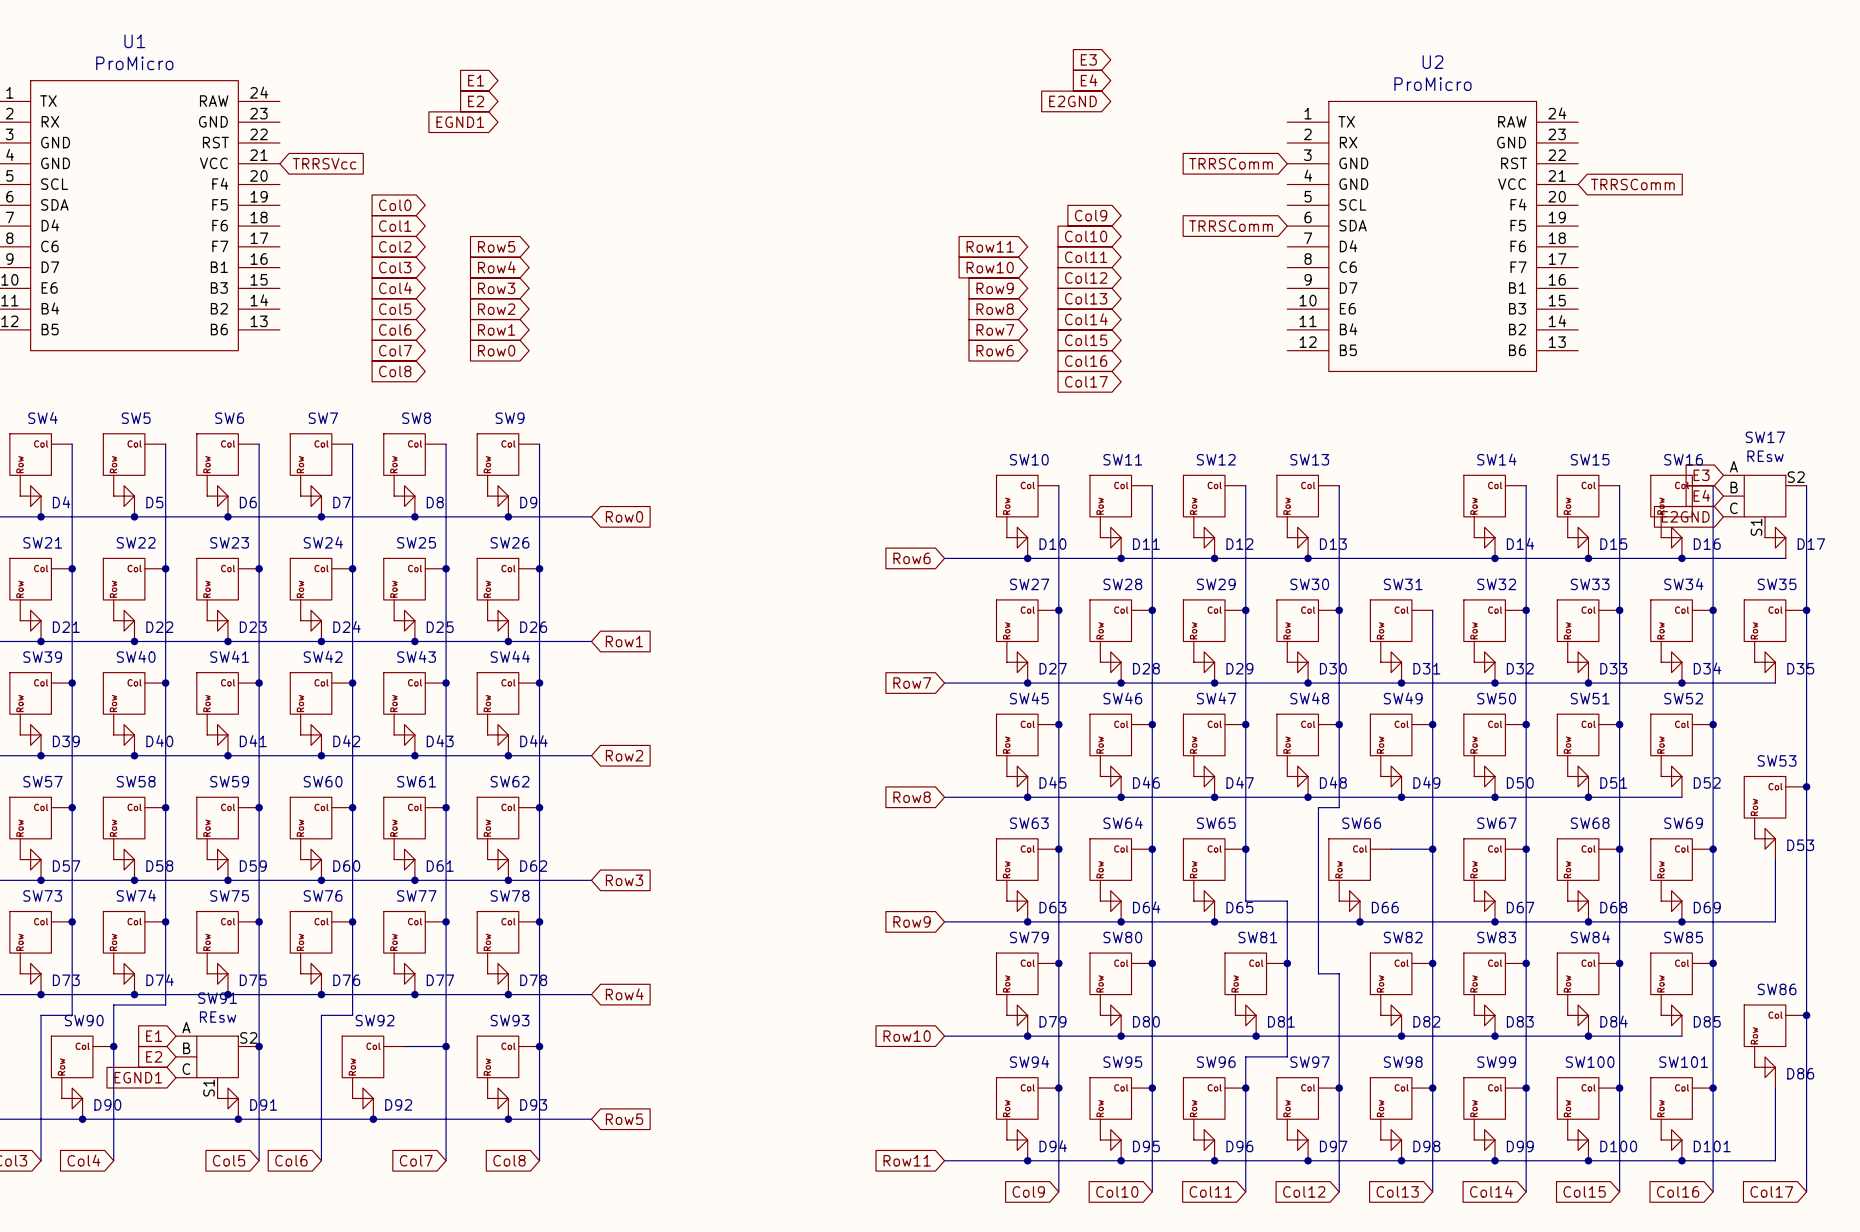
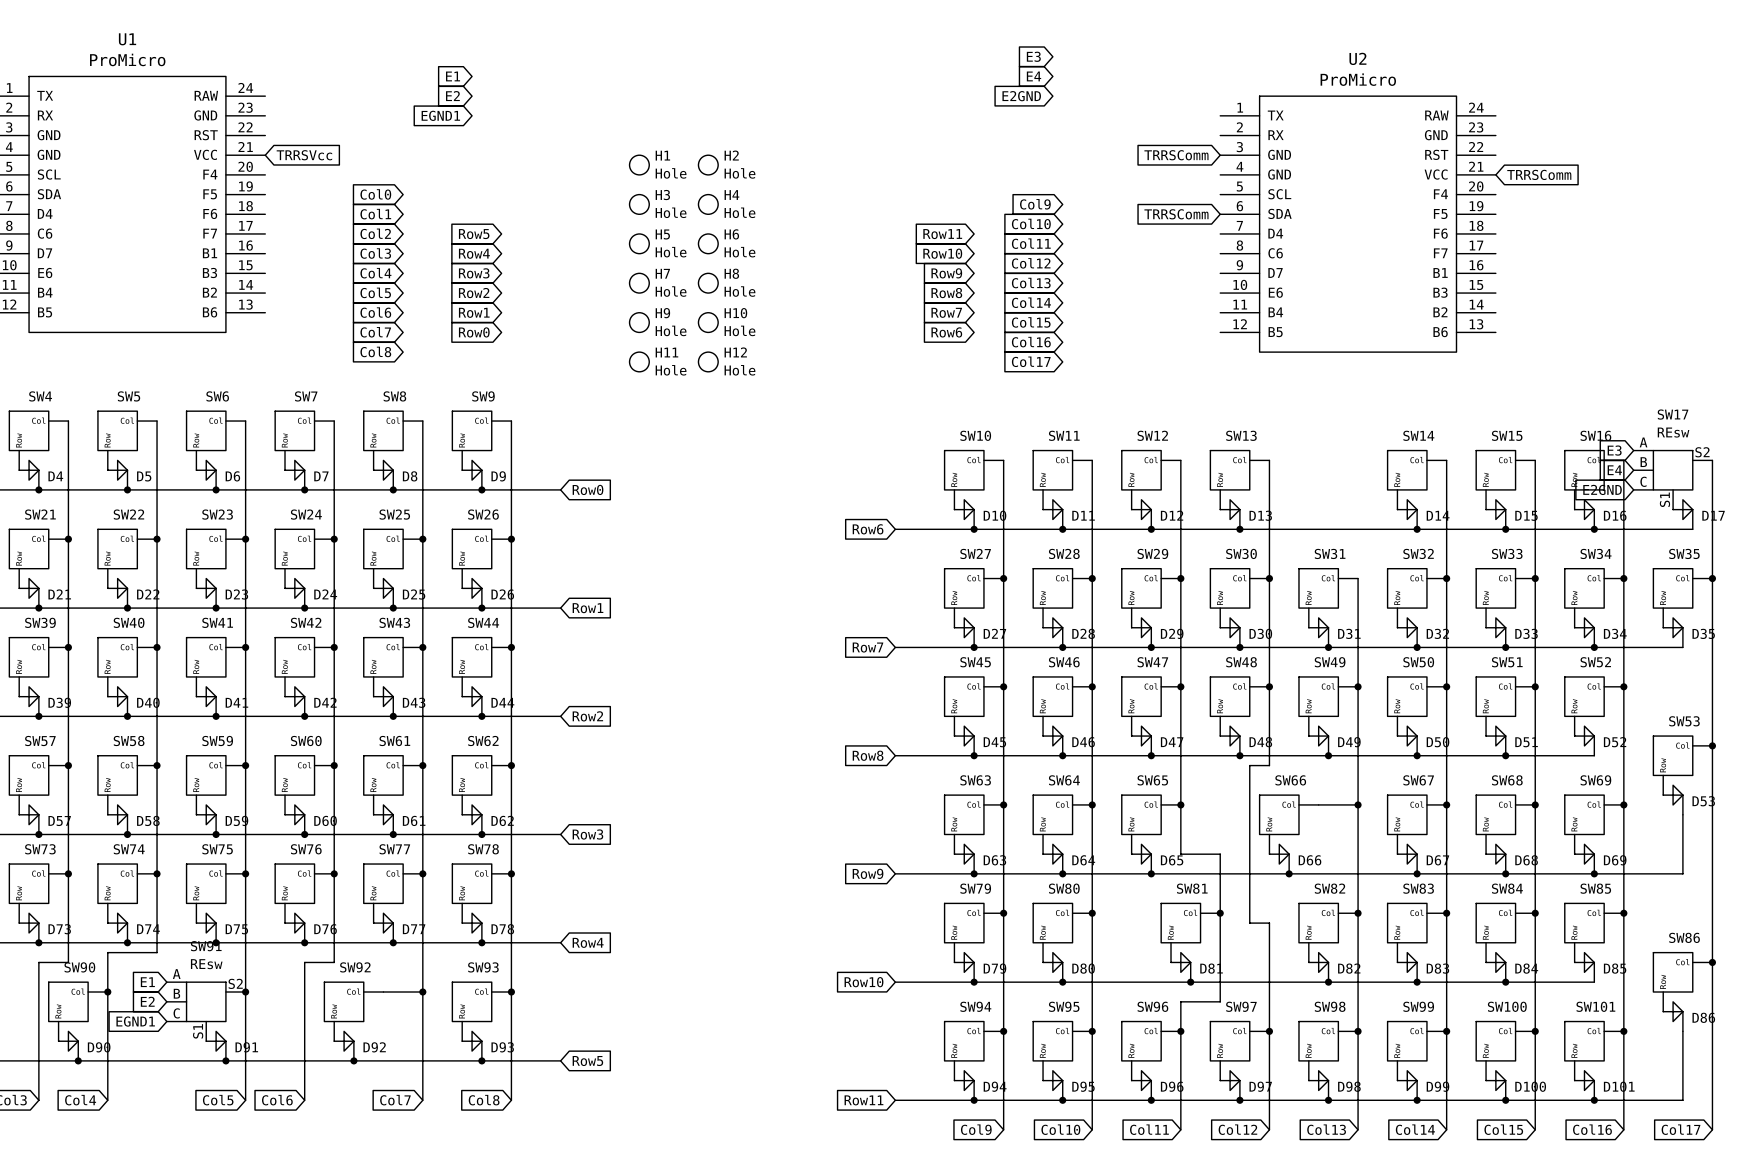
H1: none -> Hole (639, 165)
H2: none -> Hole (708, 165)
H3: none -> Hole (639, 204)
H4: none -> Hole (708, 204)
H5: none -> Hole (639, 243)
H6: none -> Hole (708, 243)
H7: none -> Hole (639, 283)
H8: none -> Hole (708, 283)
H9: none -> Hole (639, 322)
H10: none -> Hole (708, 322)
H11: none -> Hole (639, 361)
H12: none -> Hole (708, 361)

